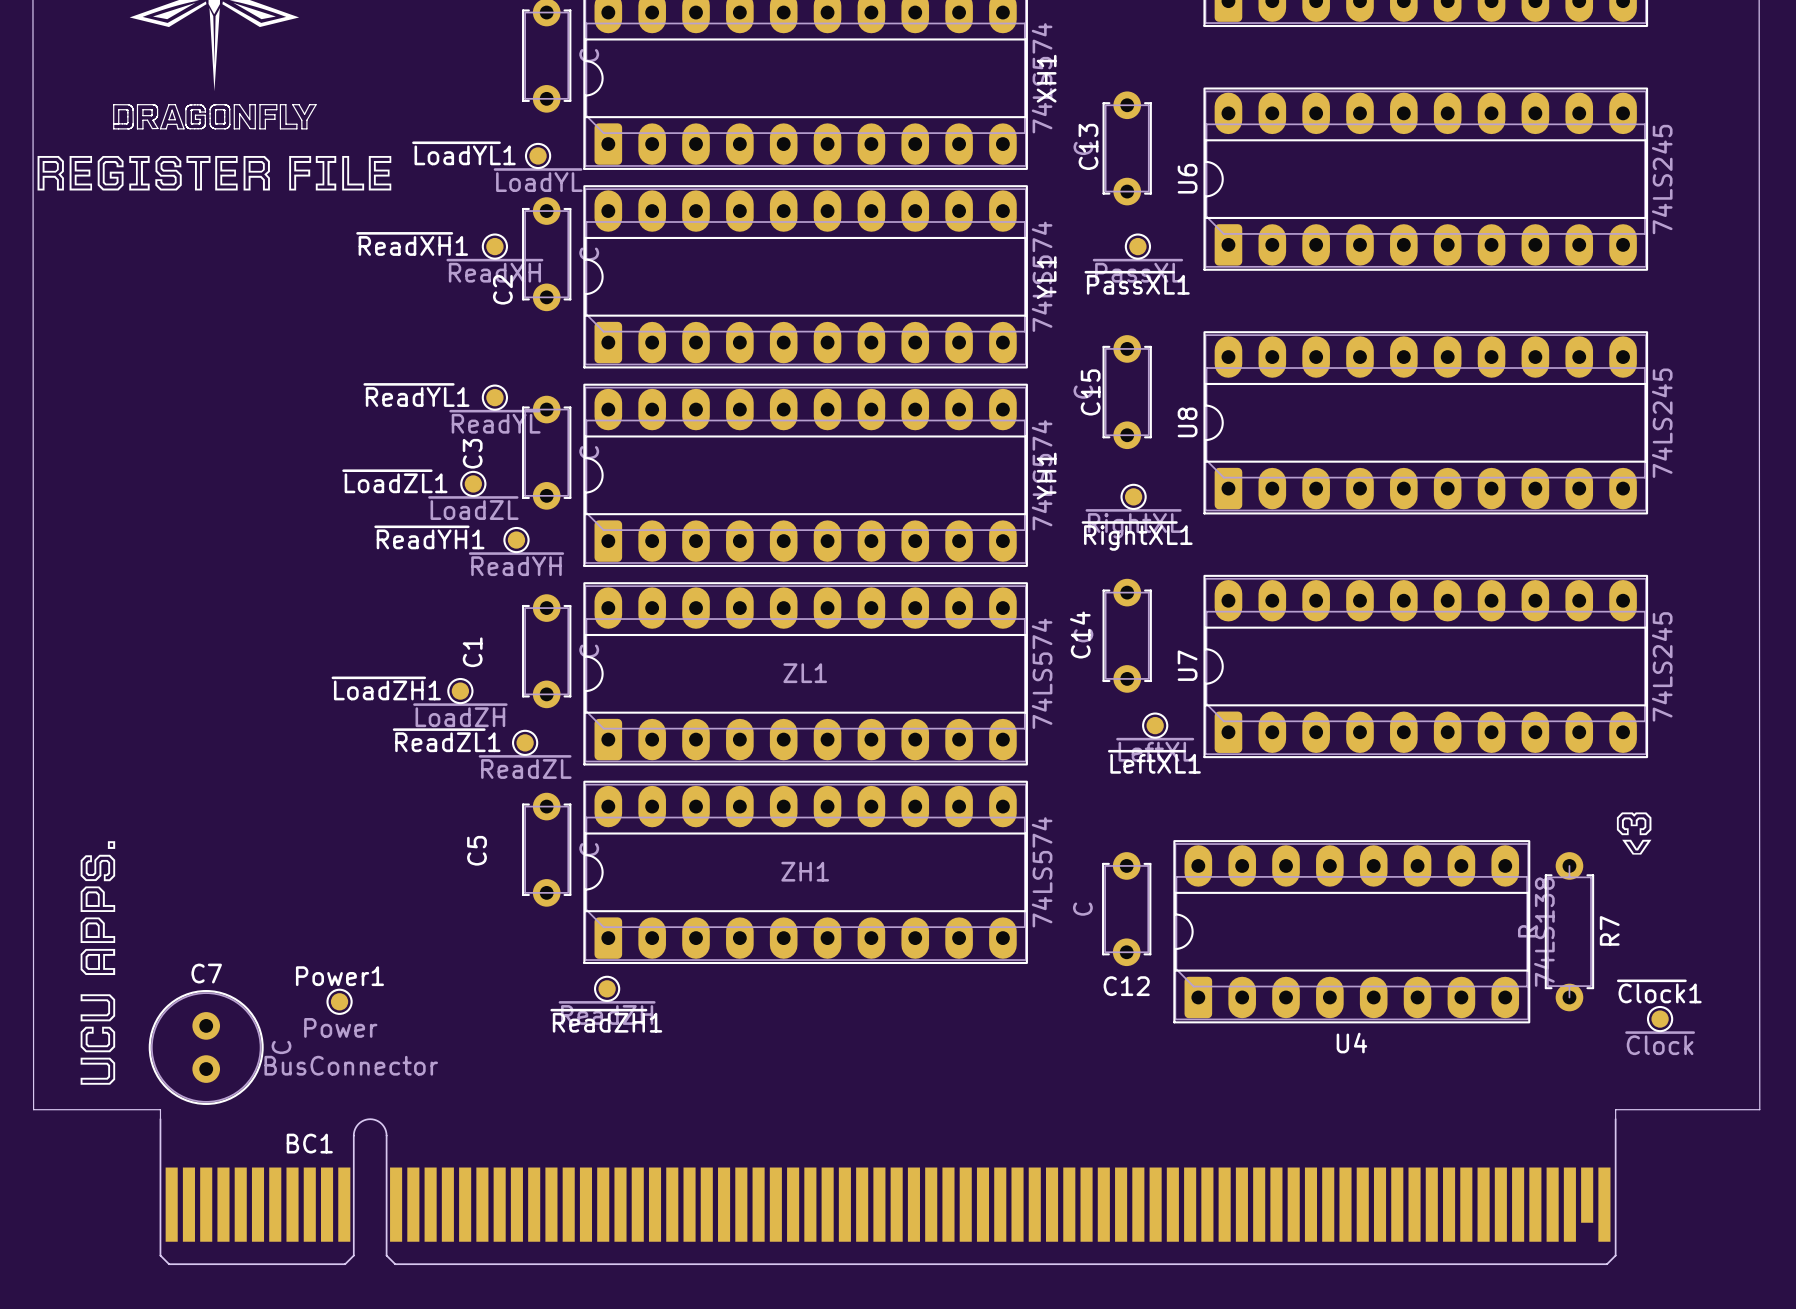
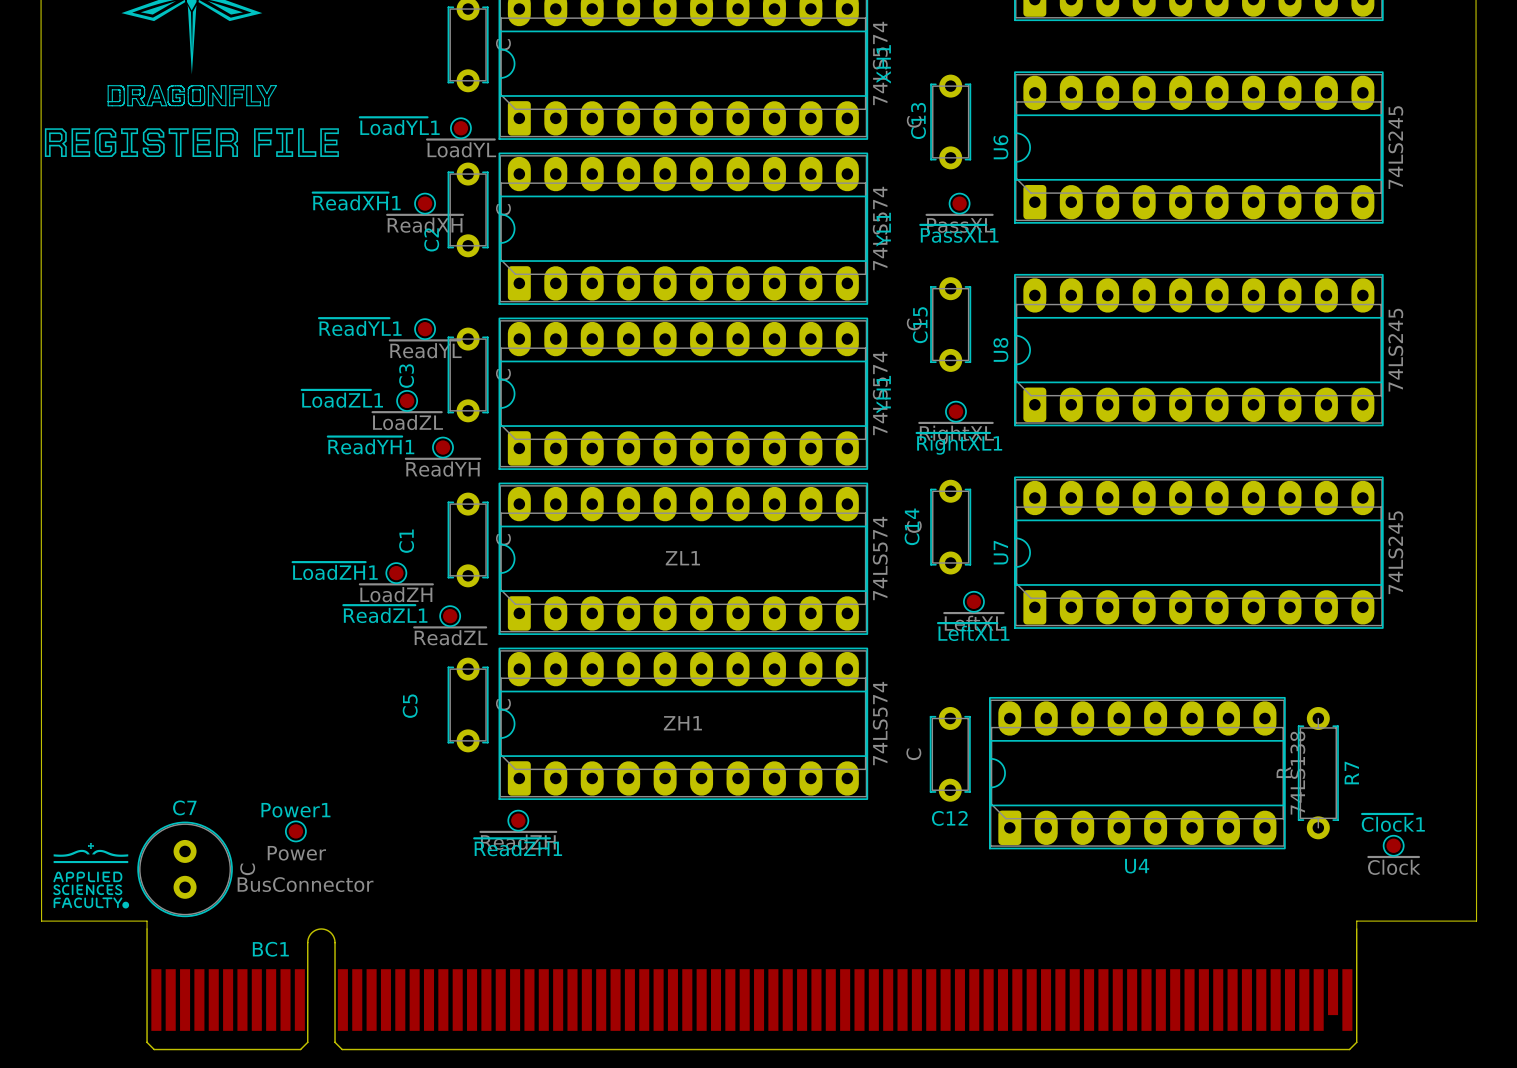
drawing: [1616, 812, 1652, 855] -> none
drawing: [80, 841, 116, 1085] -> none
drawing: none -> [53, 843, 130, 909]

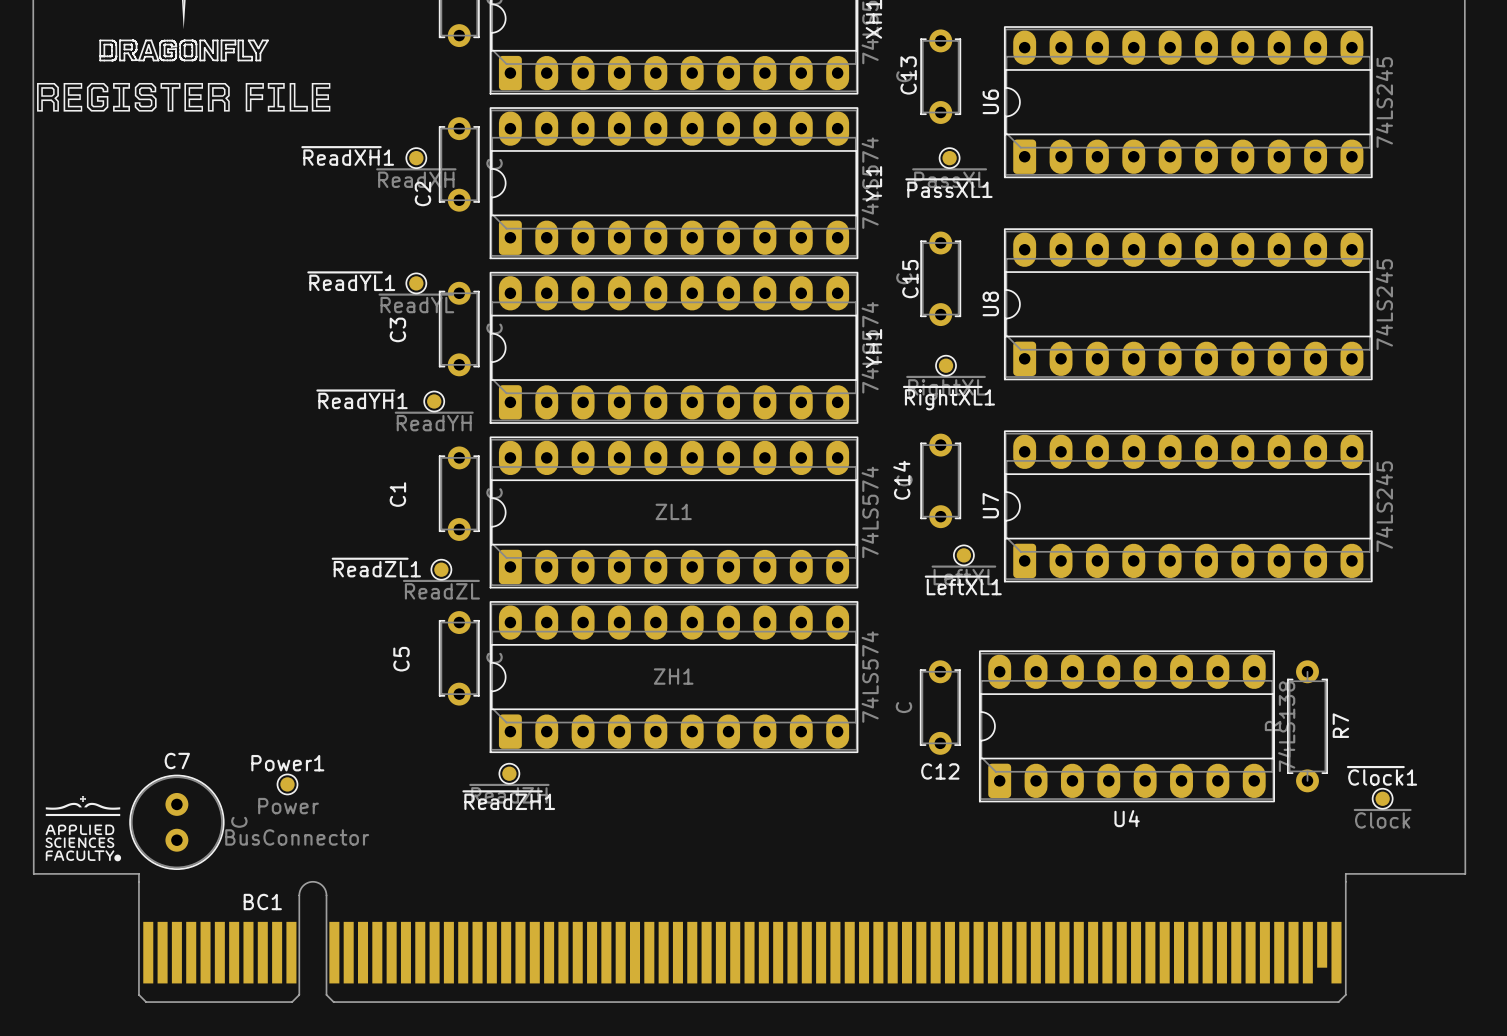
~{LoadYL}1: ~{LoadYL} (460, 128) -> none
~{LoadZL}1: ~{LoadZL} (407, 400) -> none
~{LoadZH}1: ~{LoadZH} (396, 573) -> none

